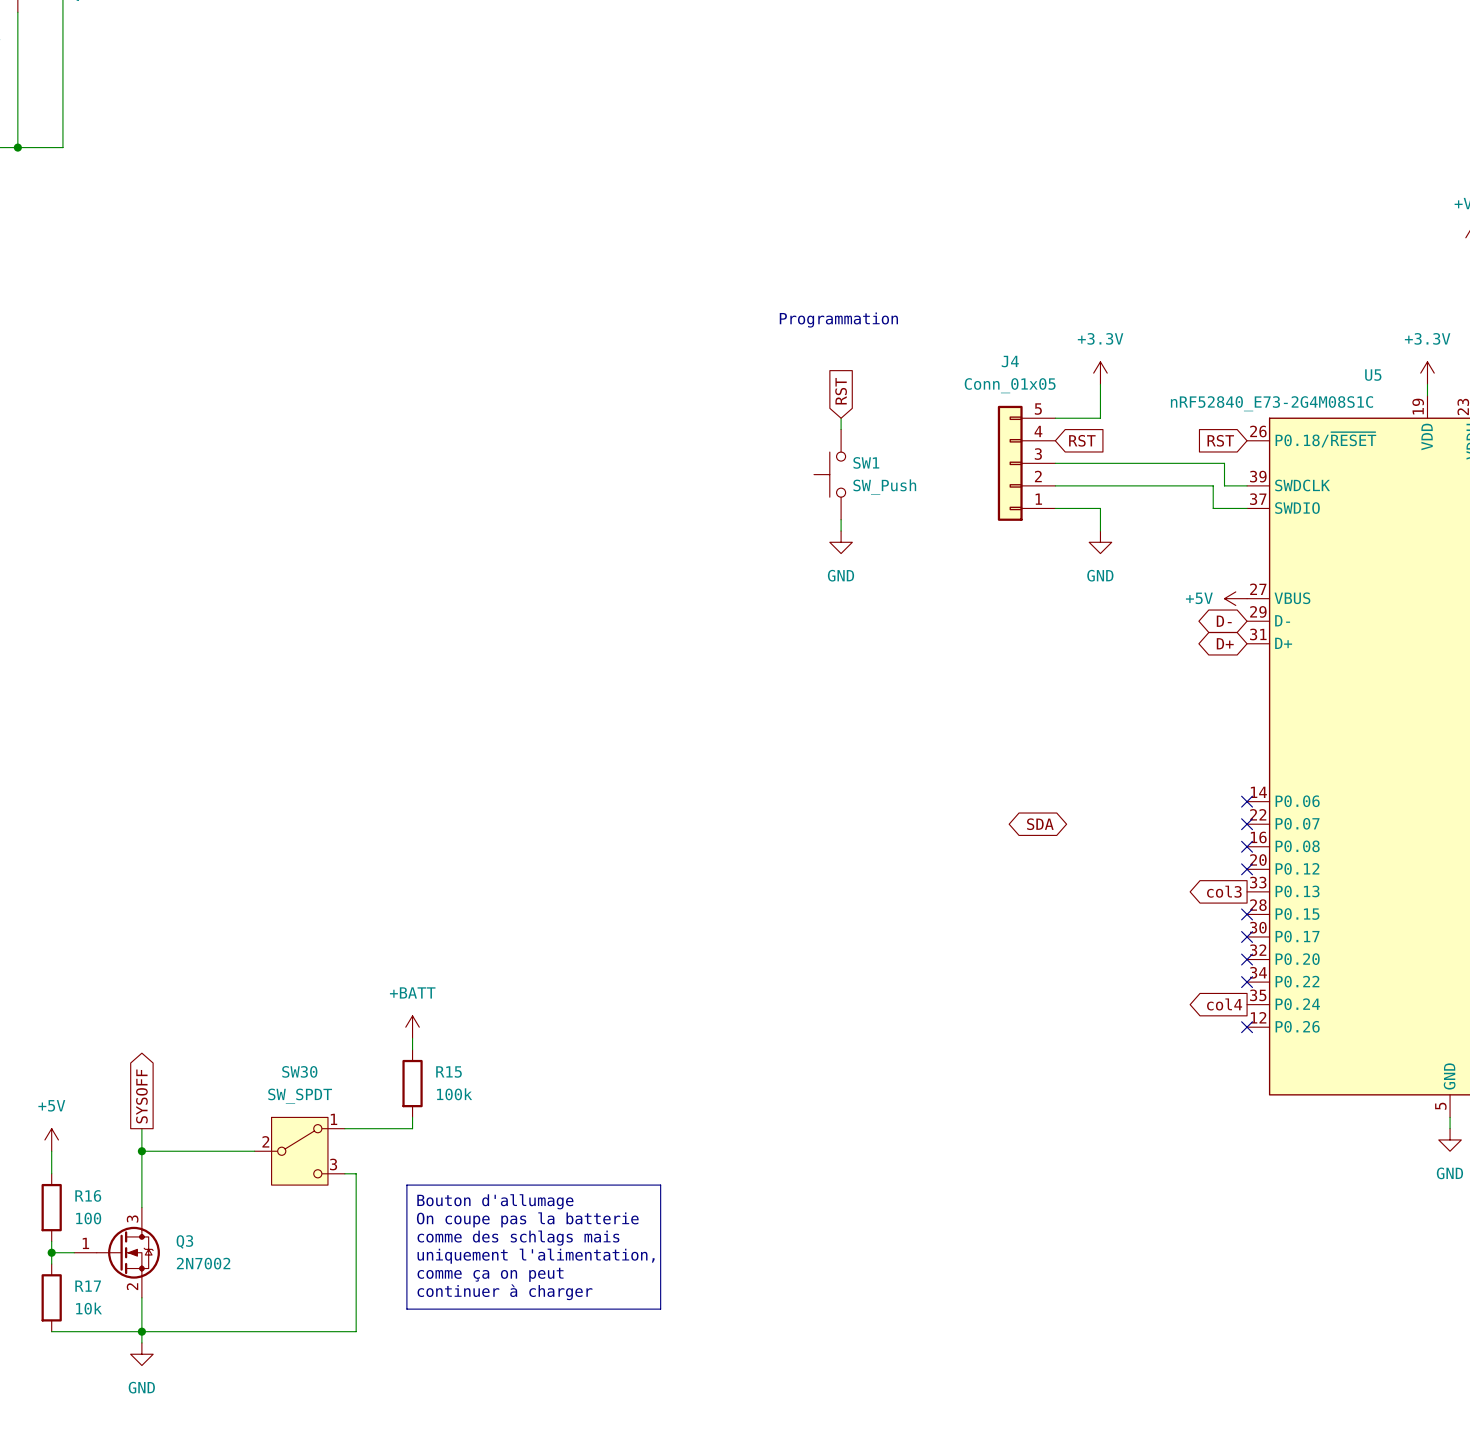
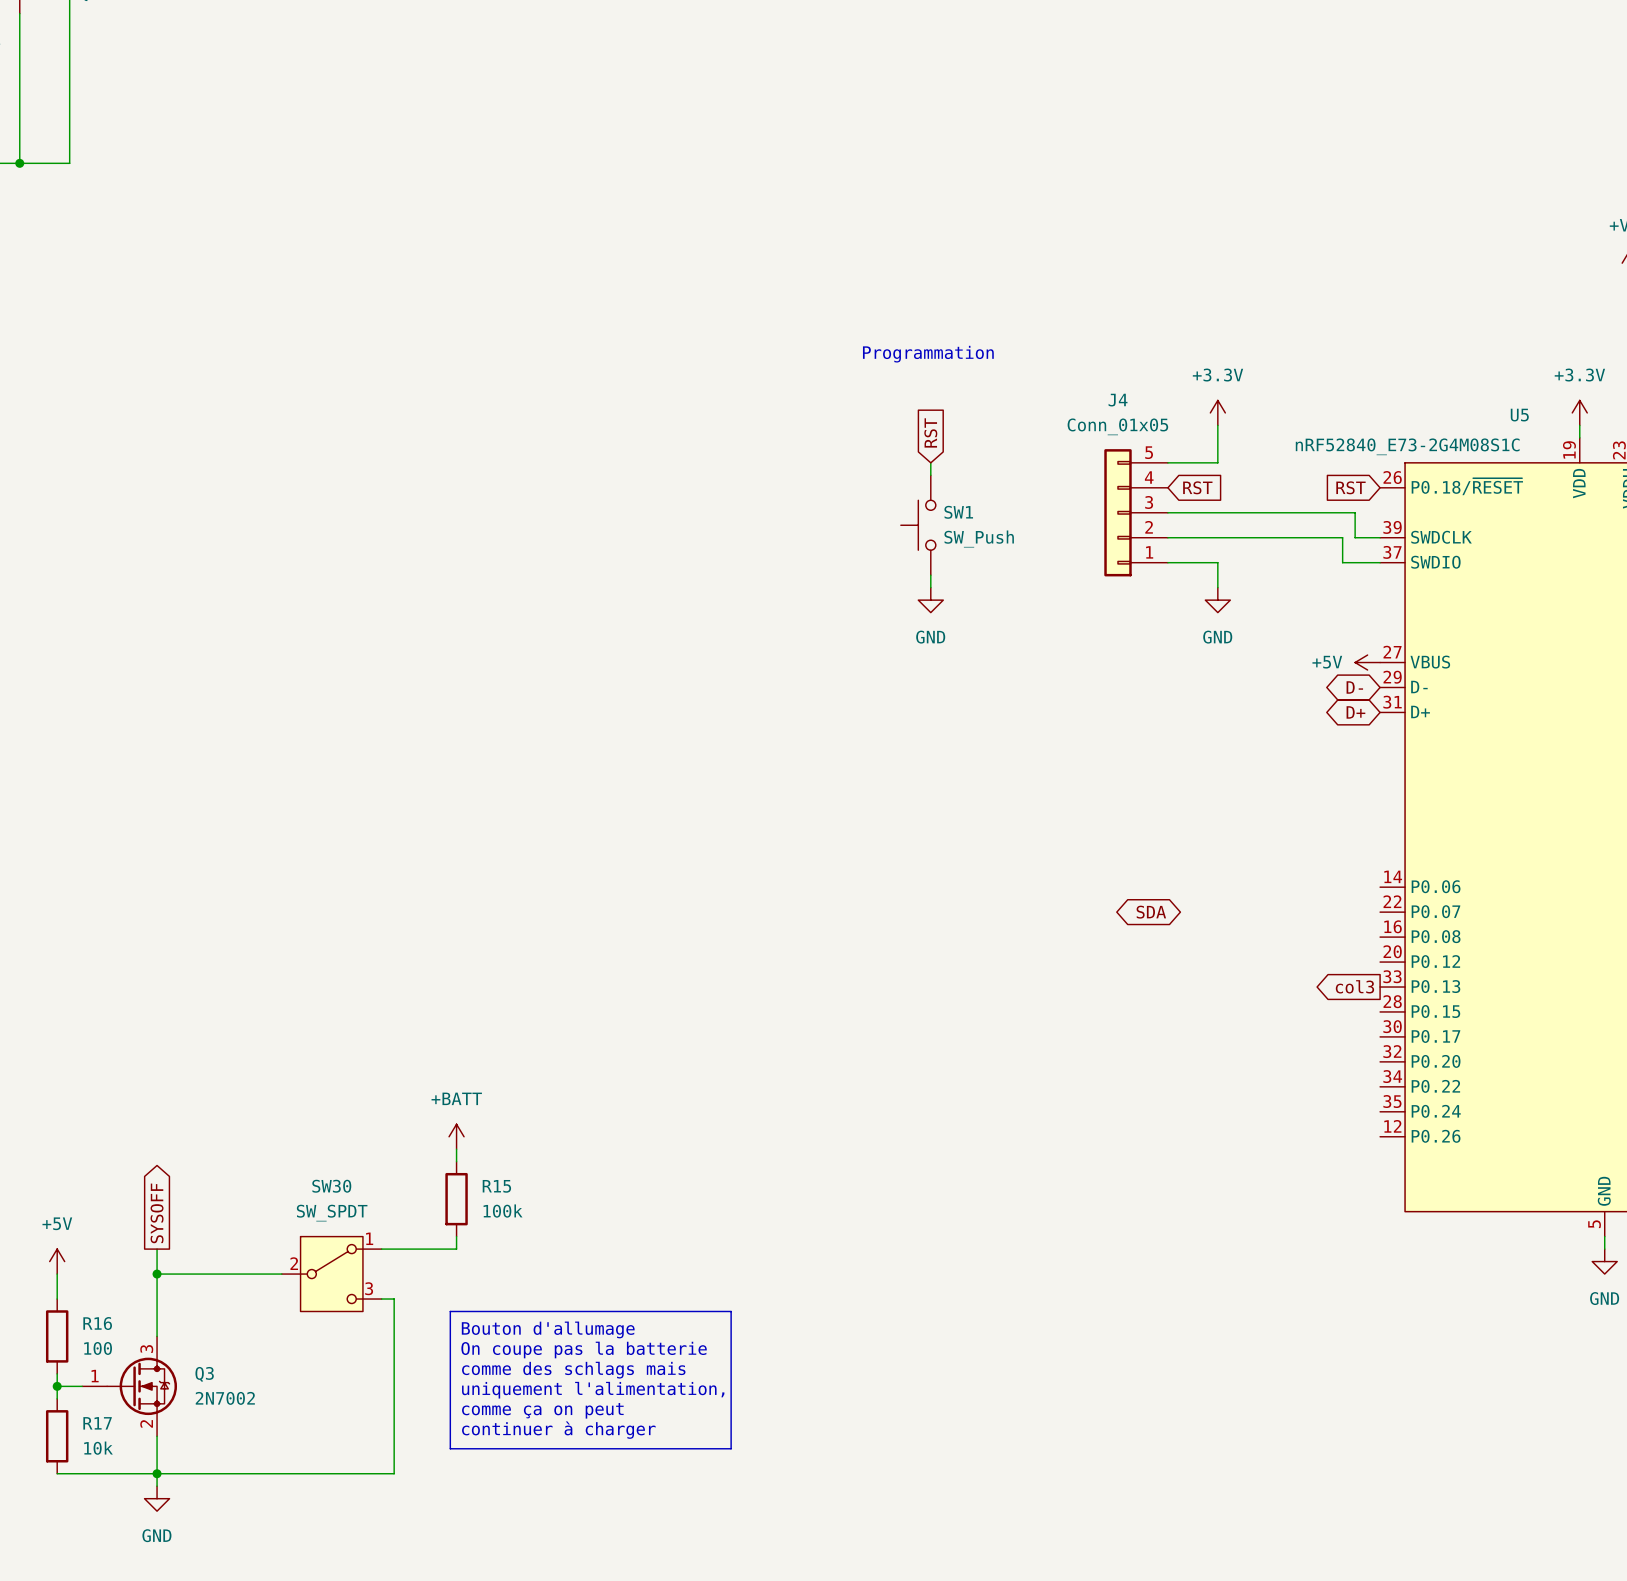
no-connect mark: (1247, 801) -> none
no-connect mark: (1247, 824) -> none
no-connect mark: (1247, 846) -> none
no-connect mark: (1247, 869) -> none
no-connect mark: (1247, 914) -> none
no-connect mark: (1247, 936) -> none
no-connect mark: (1247, 959) -> none
no-connect mark: (1247, 982) -> none
global label: col4 (1224, 1004) -> none
no-connect mark: (1247, 1027) -> none

